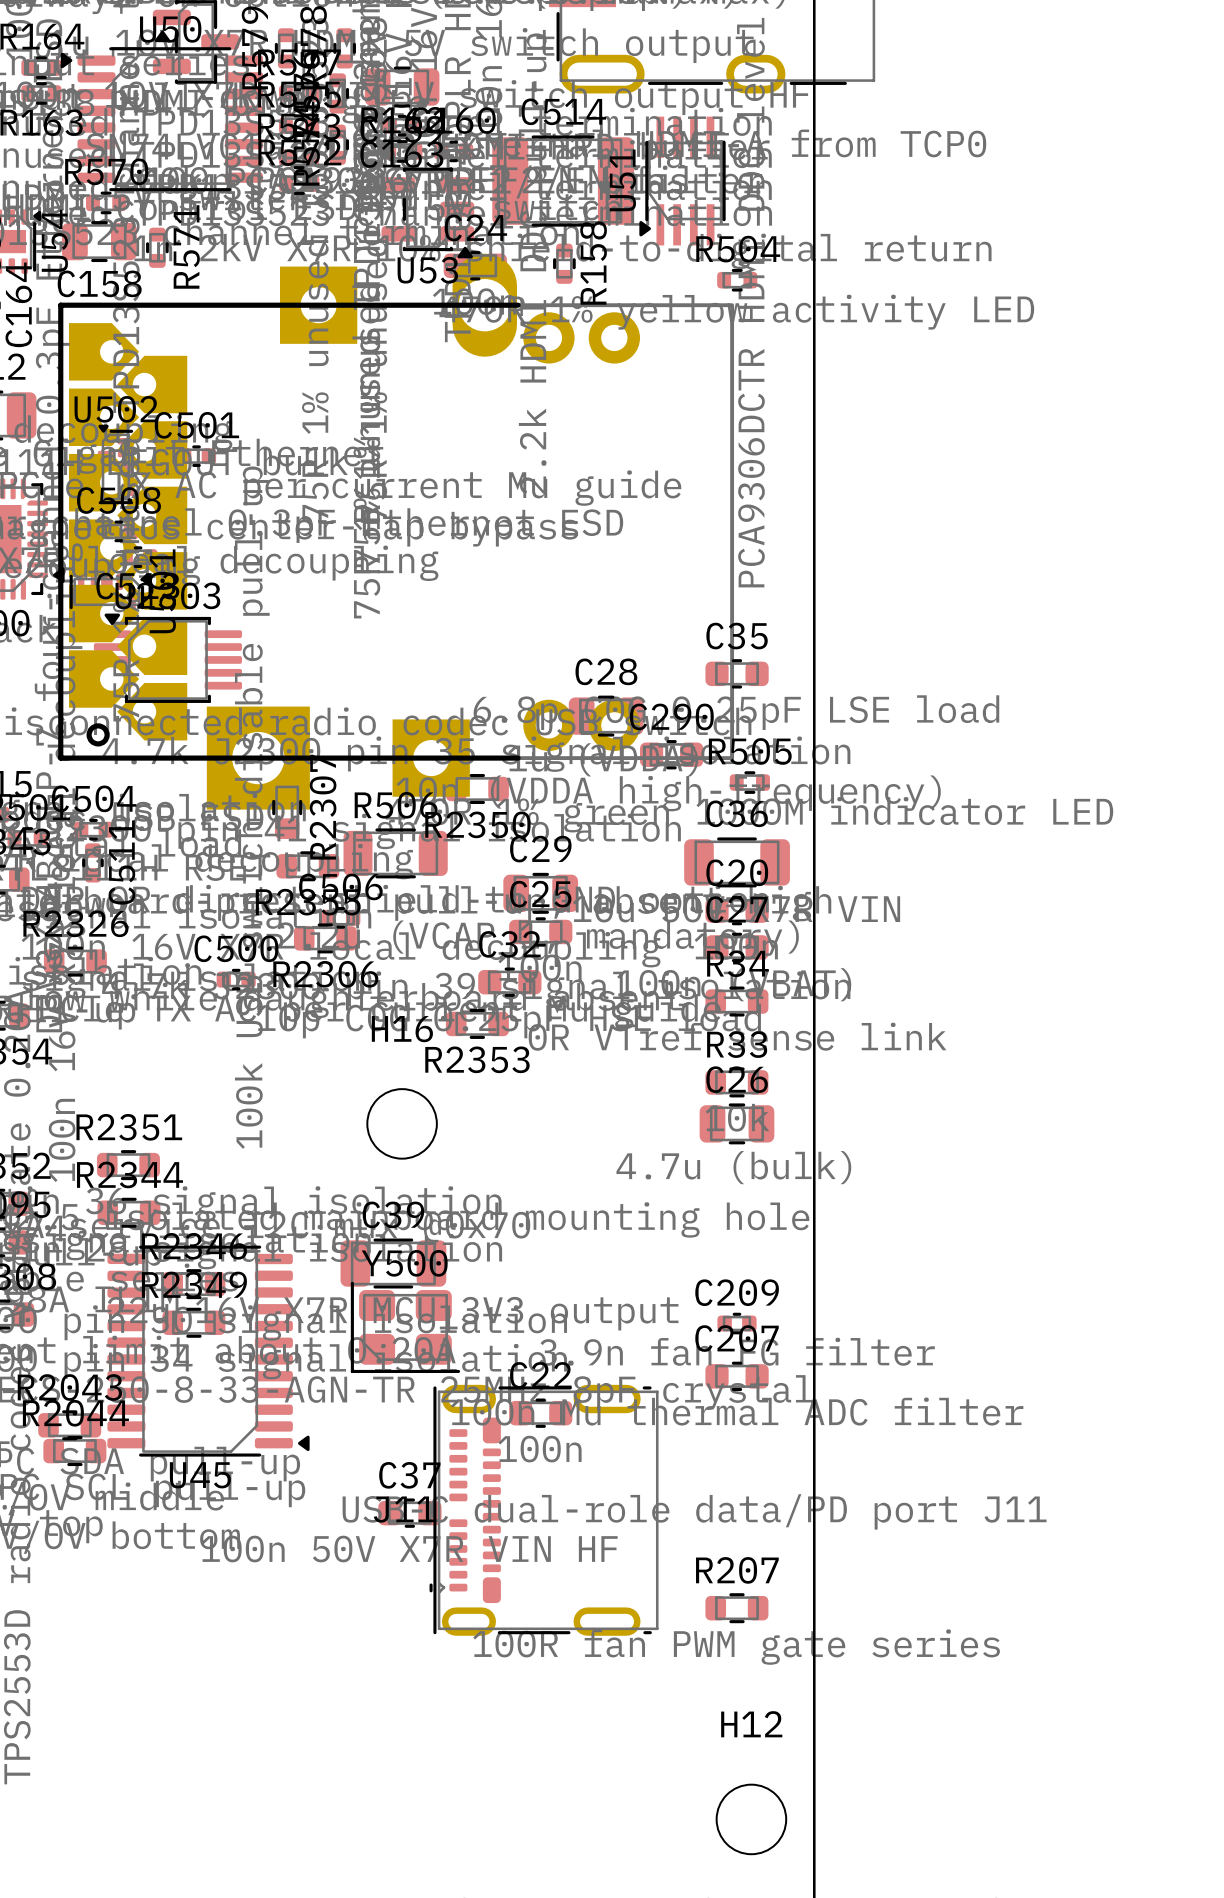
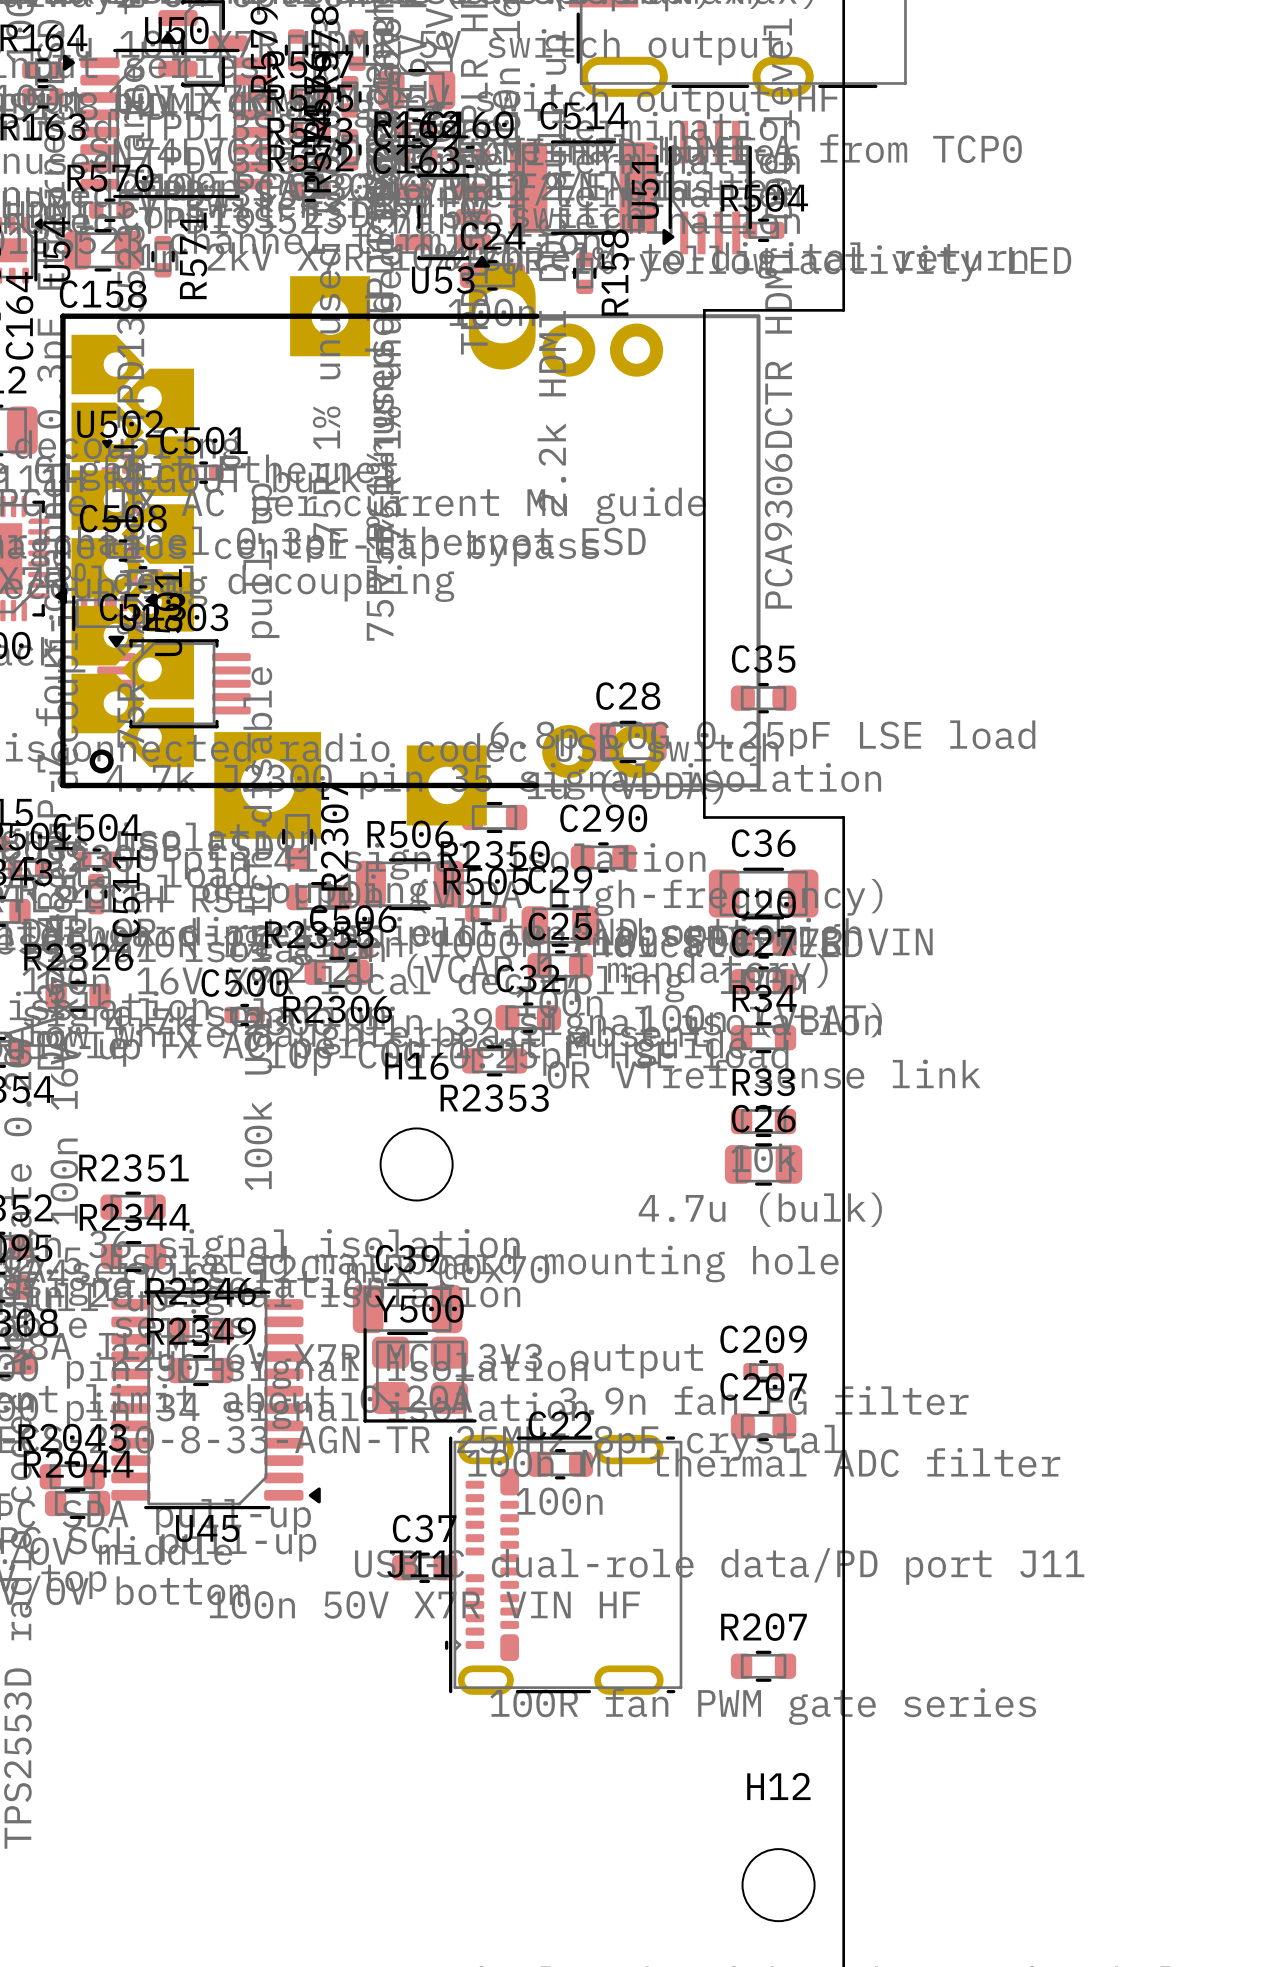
R504 position: (737, 280) -> (763, 230)
board edge: (814, 299) (814, 789) -> (843, 310) (704, 310) (704, 817) (843, 817)
C290 position: (671, 754) -> (603, 857)
R505 position: (749, 782) -> (486, 913)

